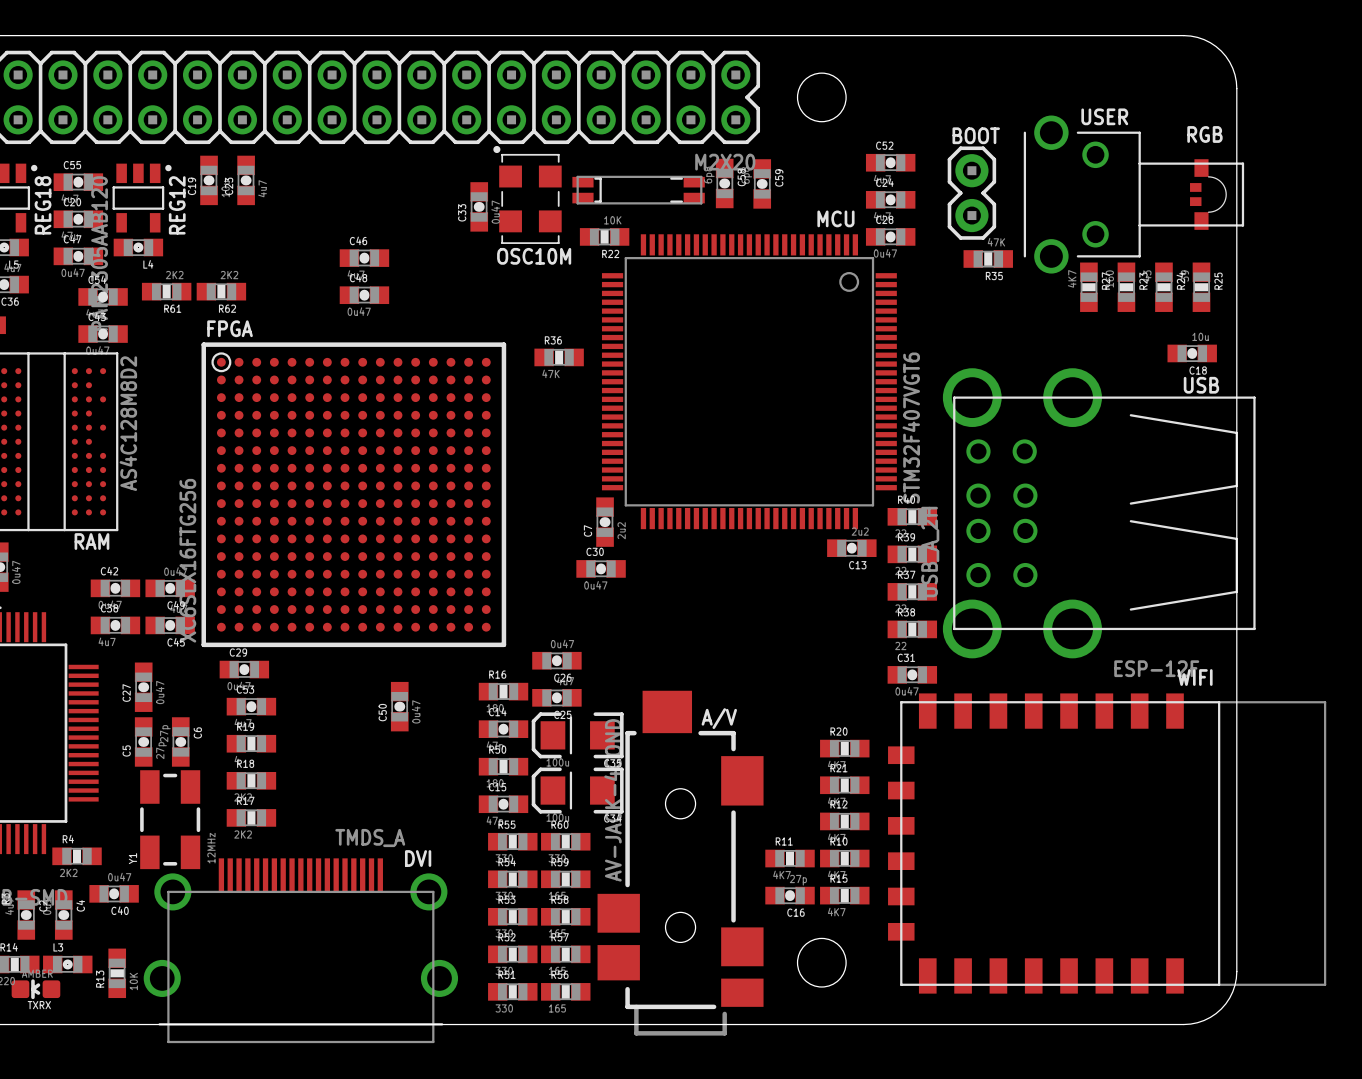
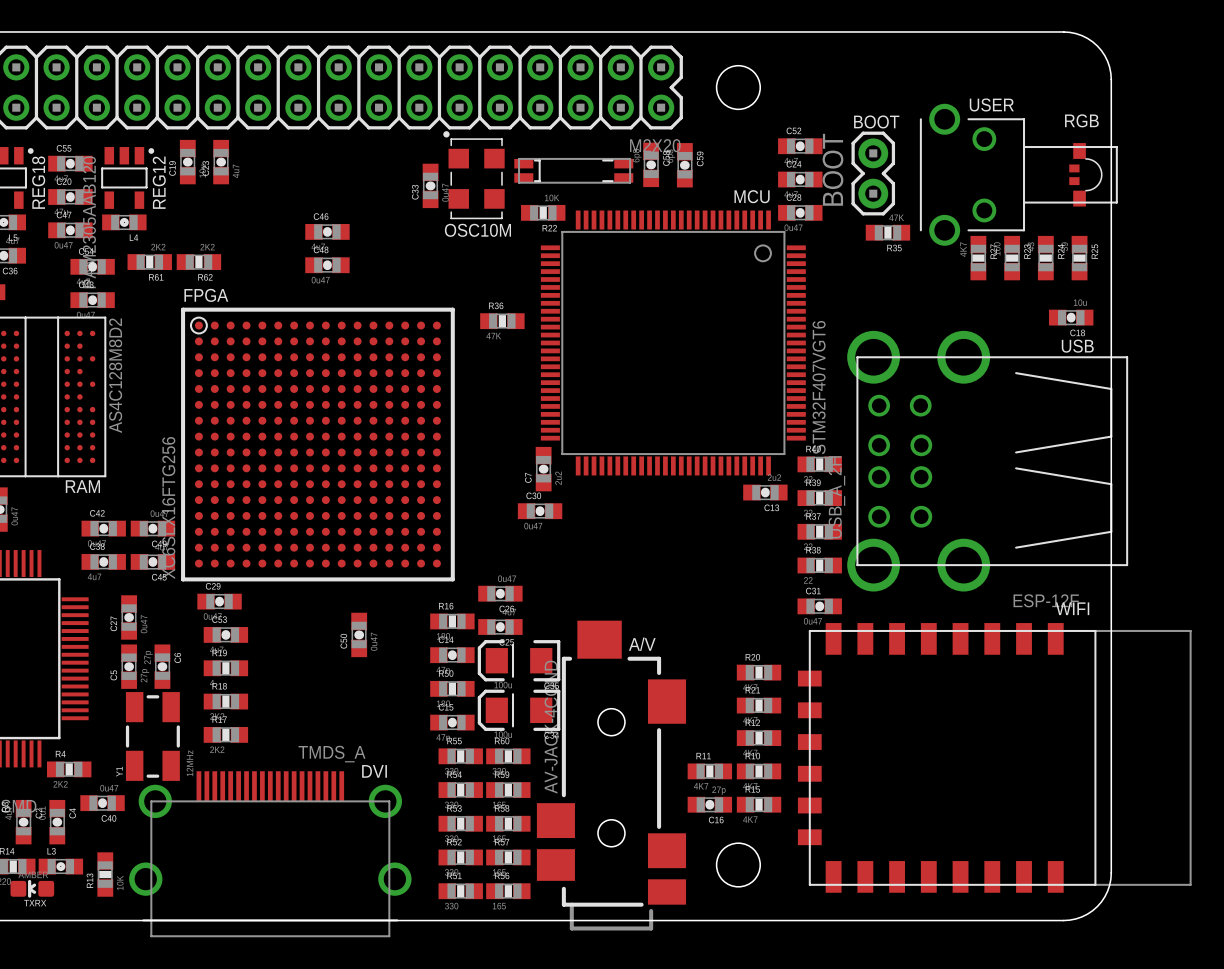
BOOT value: none -> BOOT (832, 169)

